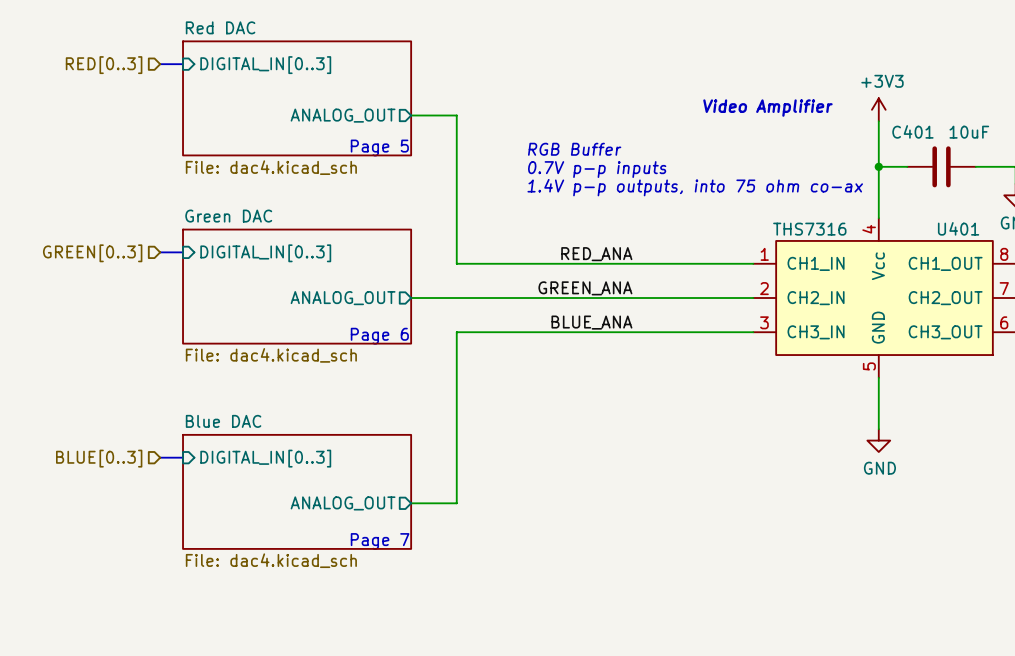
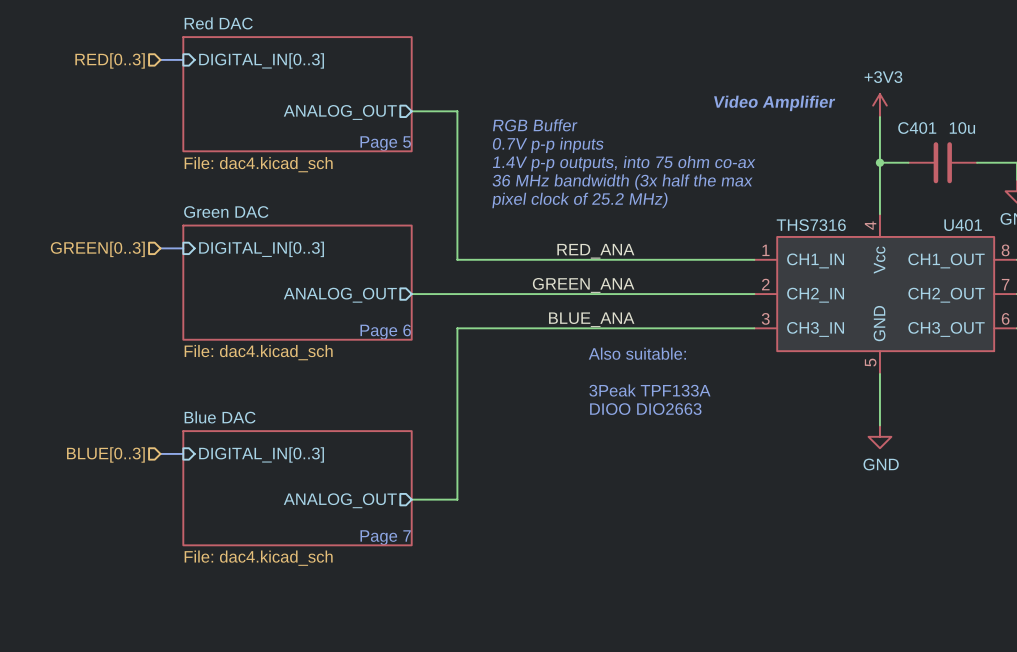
C401 value: 10uF (969, 132) -> 10u (962, 128)
text position: RGB Buffer (574, 149) -> RGB Buffer (535, 125)
text position: 0.7V p-p inputs (597, 169) -> 0.7V p-p inputs (548, 145)
text: none -> 36 MHz bandwidth (3x half the max (622, 182)
text position: 1.4V p-p outputs, into 75 ohm co-ax (695, 187) -> 1.4V p-p outputs, into 75 ohm co-ax (624, 163)
text: none -> pixel clock of 25.2 MHz) (580, 200)
text: none -> Also suitable: (637, 353)
text: none -> 3Peak TPF133A (649, 390)
text: none -> DIOO DIO2663 (645, 409)

